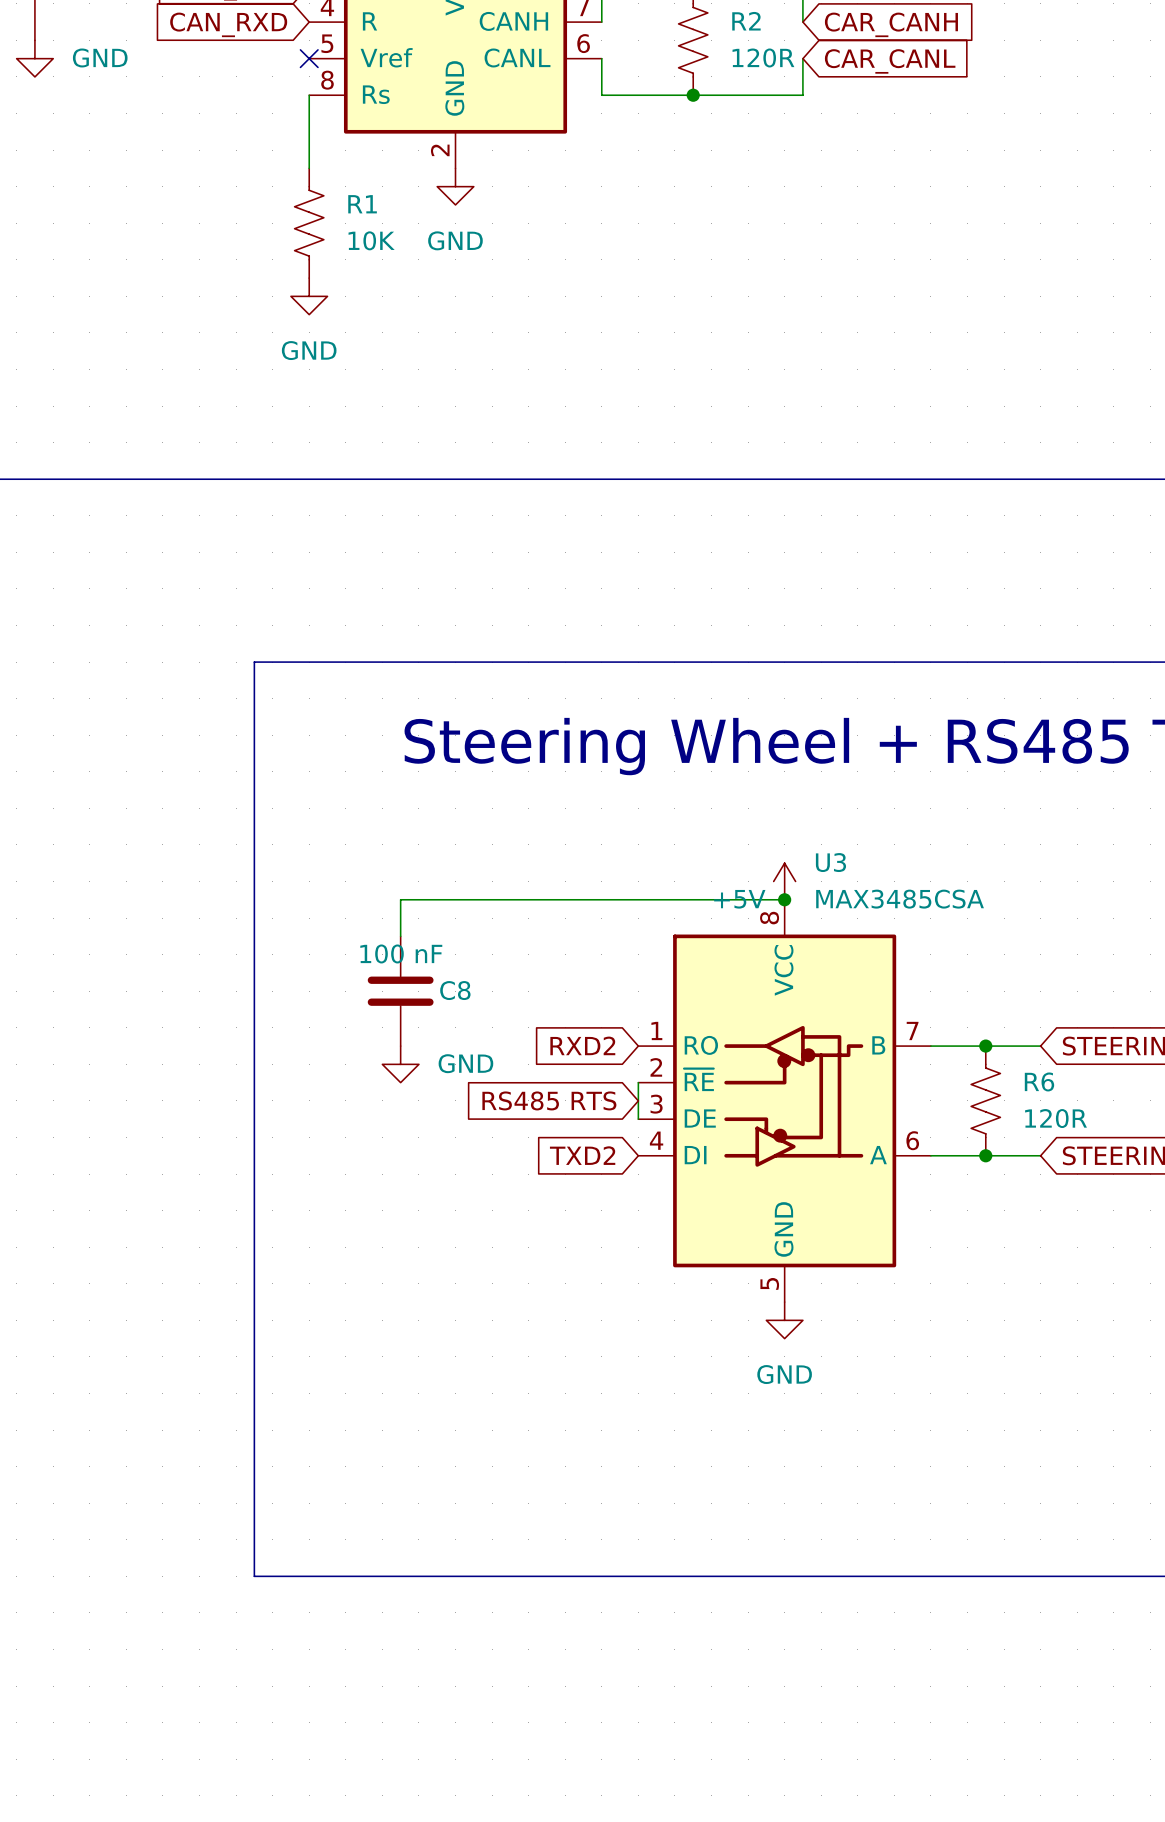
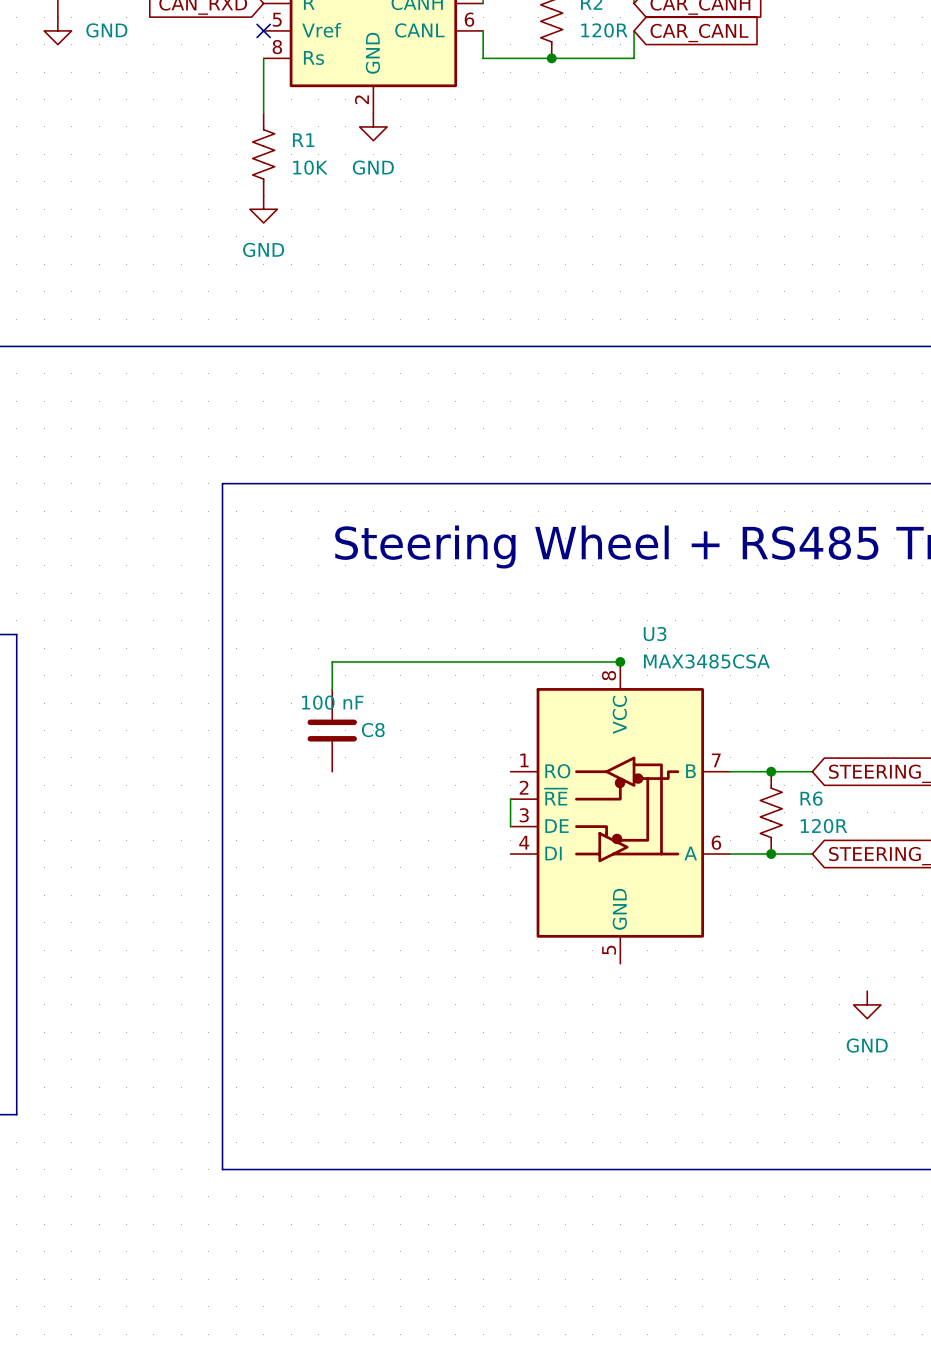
power symbol: +5V (784, 881) -> none
global label: RXD2 (582, 1045) -> none
power symbol: GND (400, 1064) -> none
global label: RS485 RTS (549, 1100) -> none
global label: TXD2 (582, 1155) -> none
power symbol: GND (784, 1320) -> none
power symbol: none -> GND (867, 1004)

